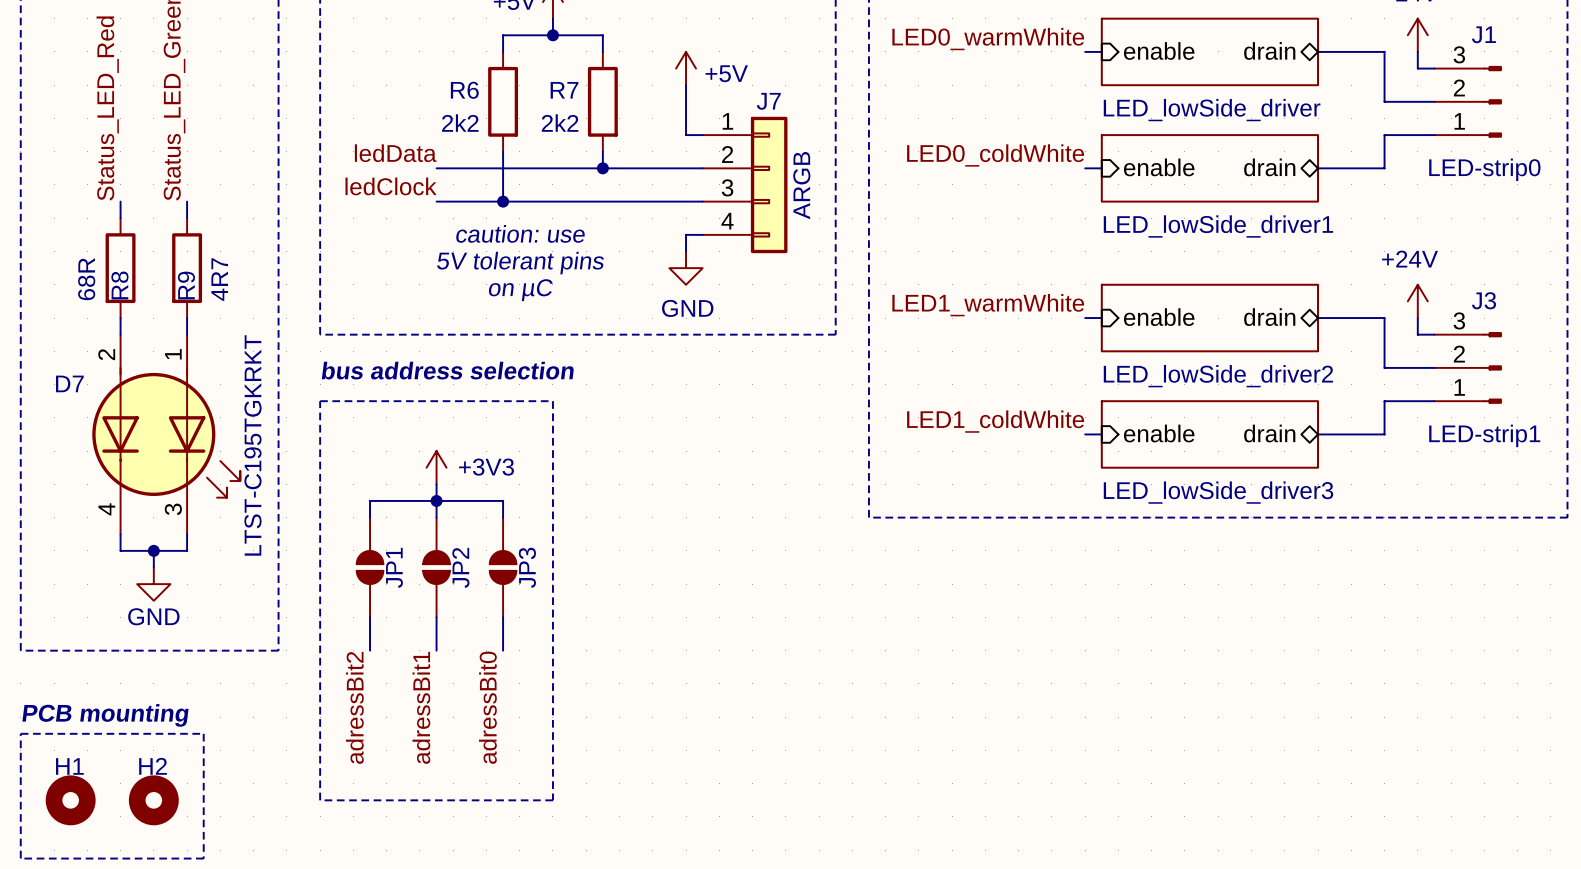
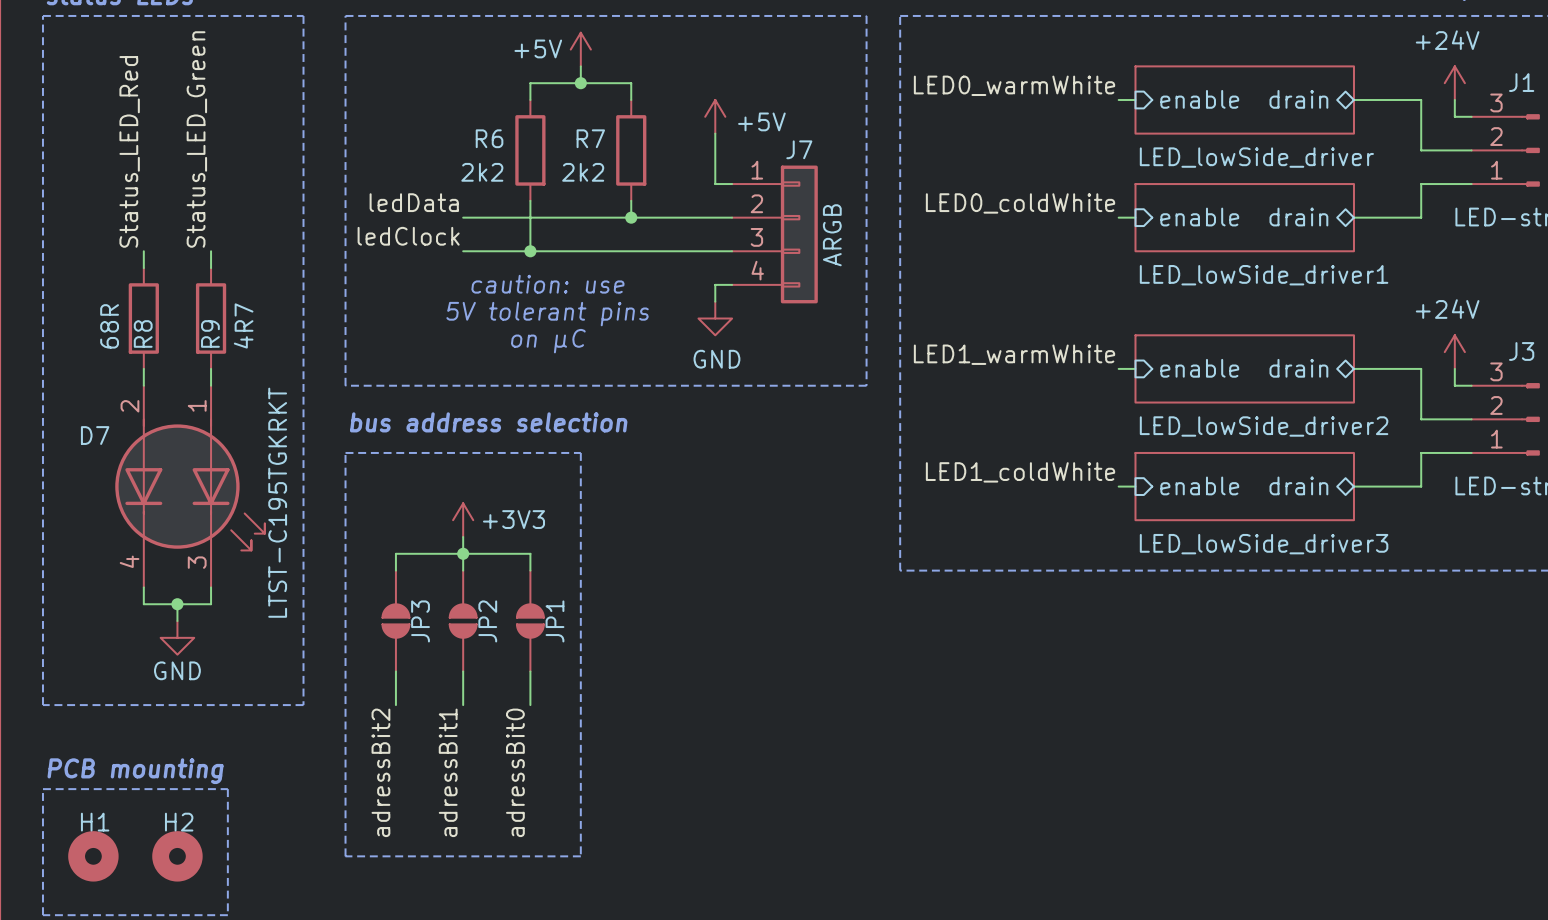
JP1 name: JP1 (394, 567) -> JP3 (420, 621)
JP3 name: JP3 (527, 567) -> JP1 (554, 621)

